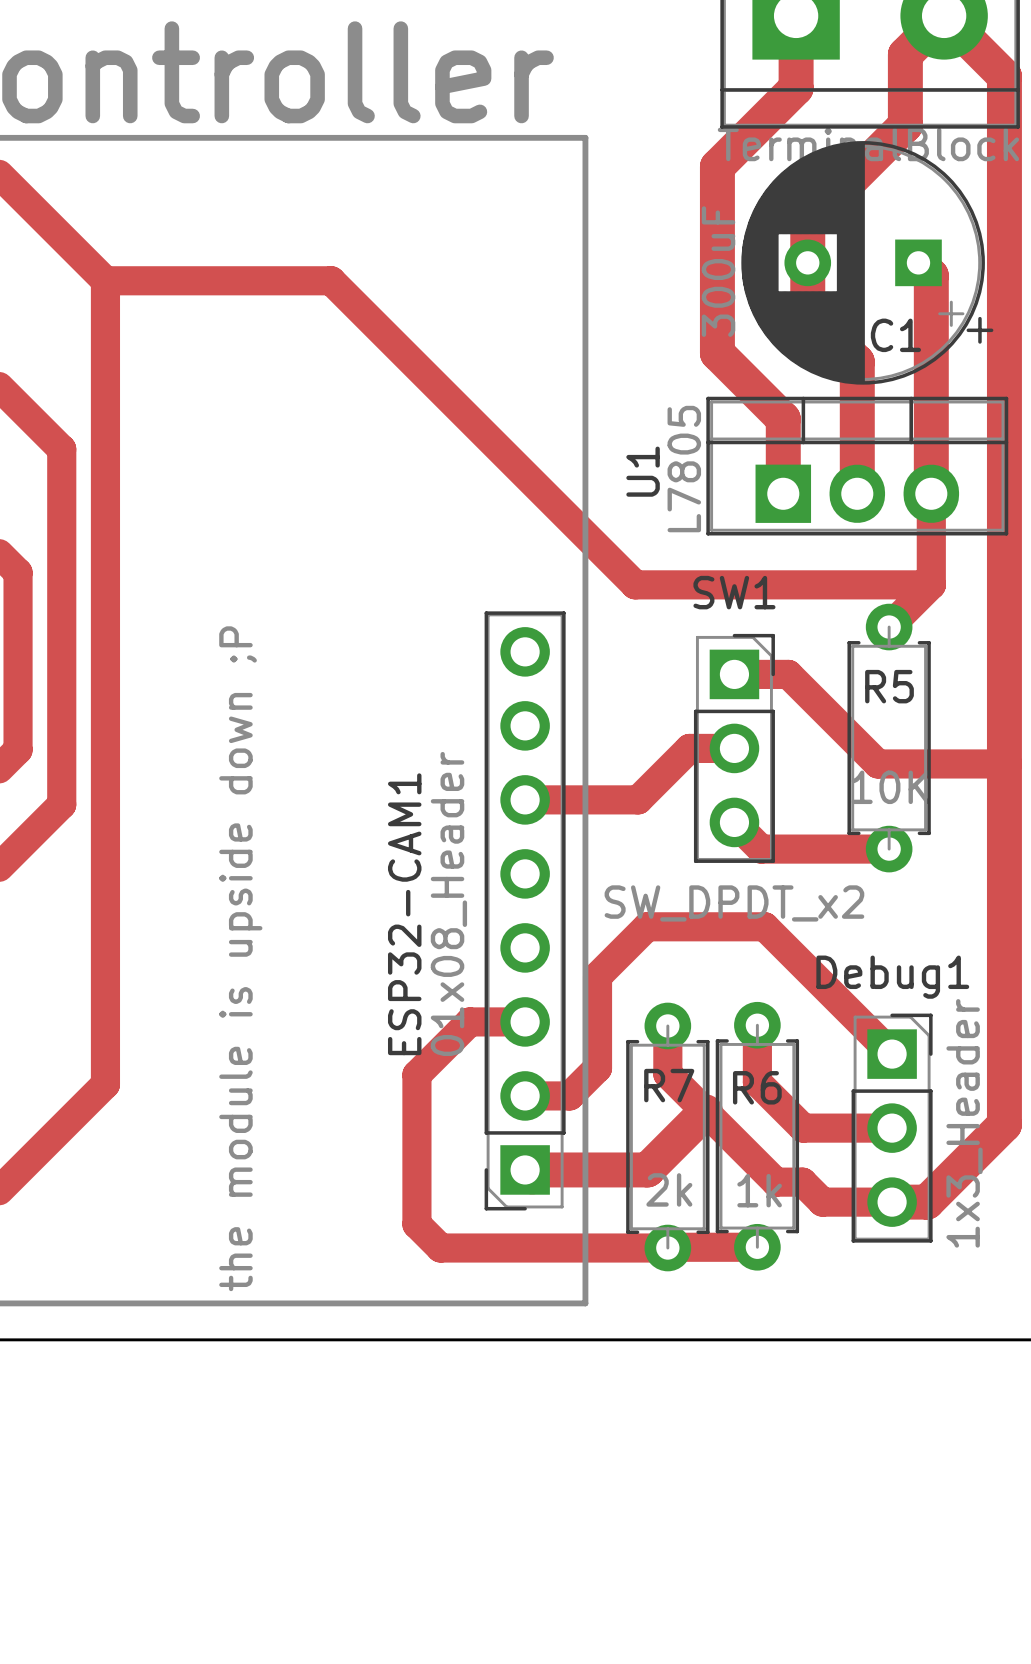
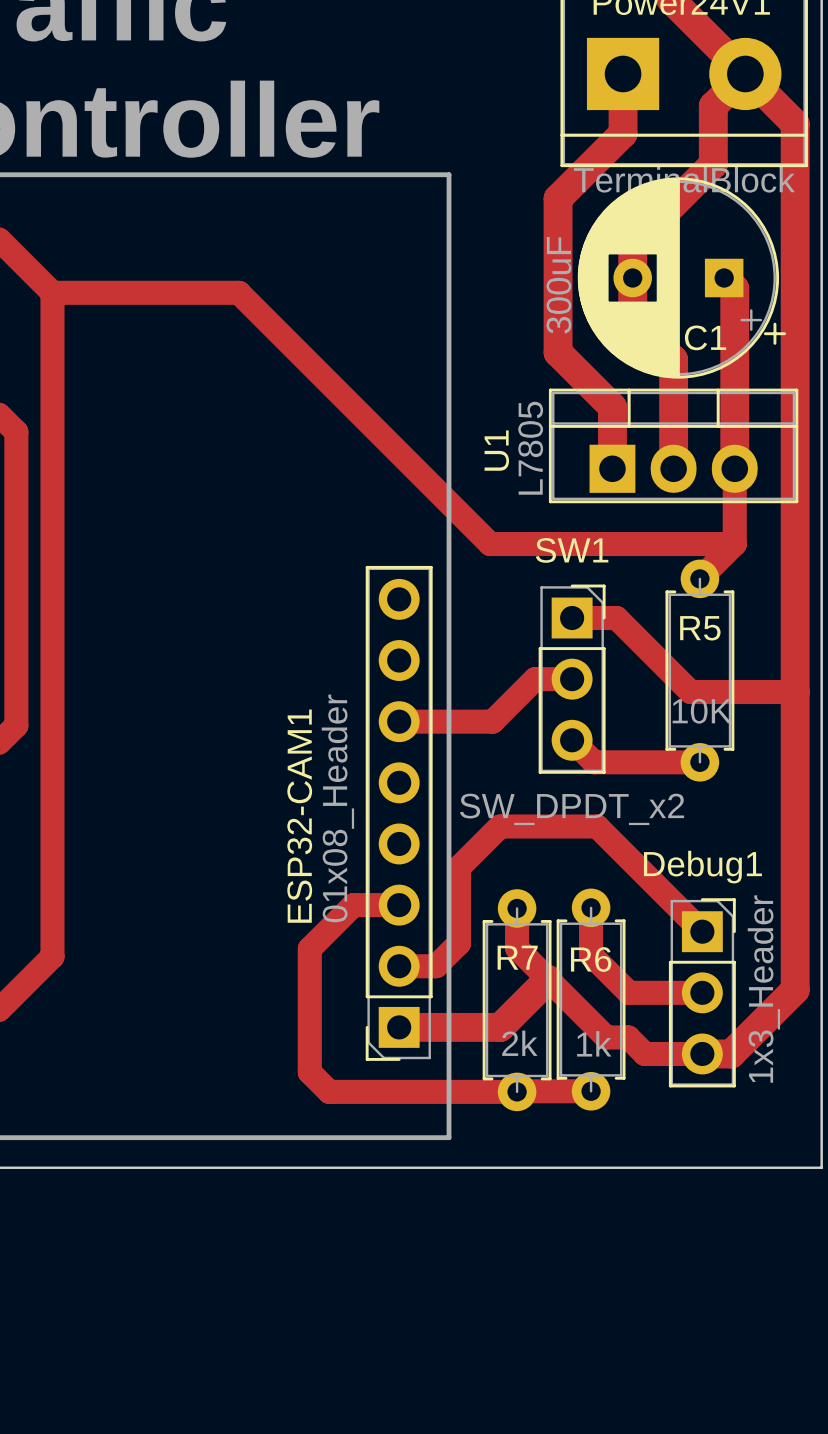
text: the module is upside down ;P (240, 958) -> none

